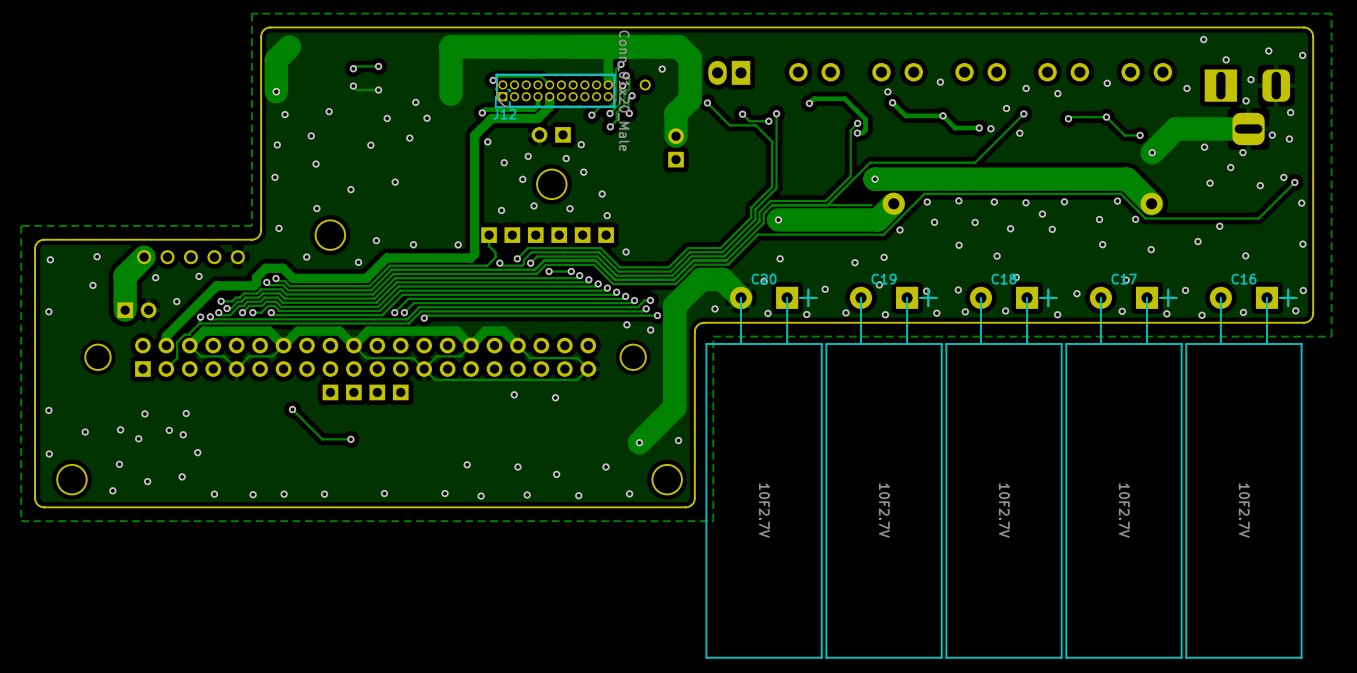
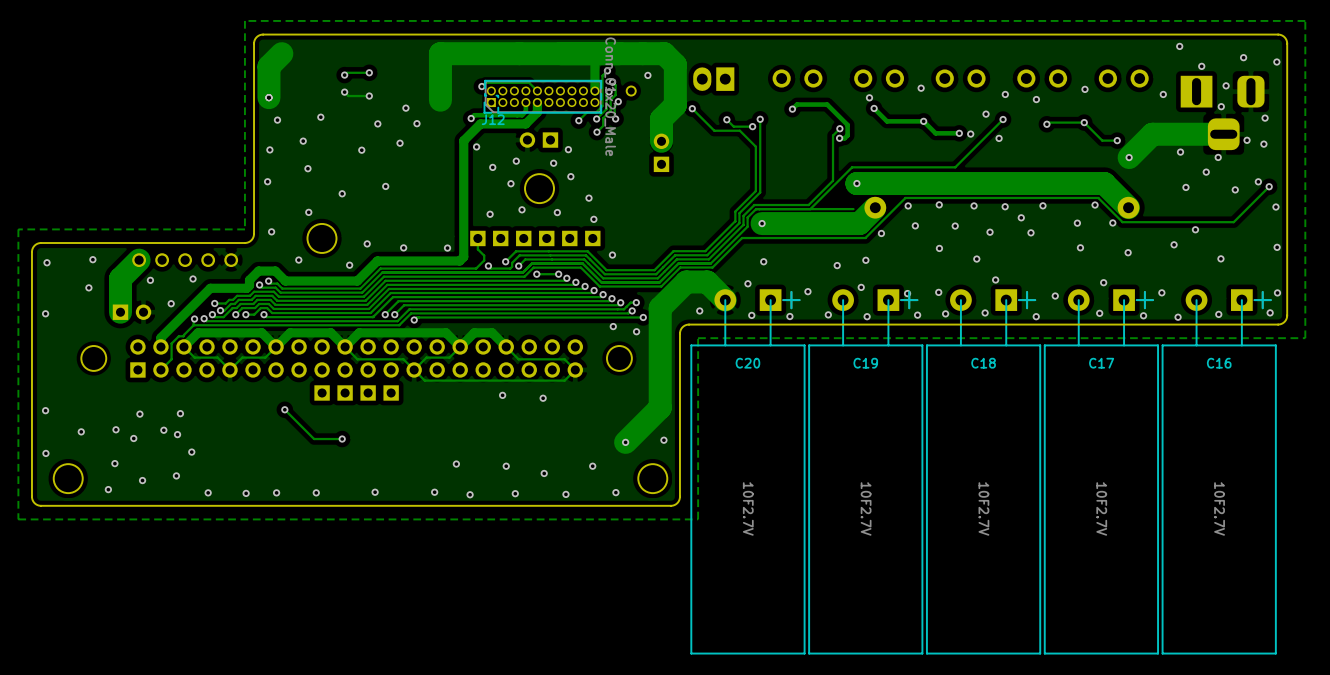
C20 name position: C20 (764, 279) -> C20 (747, 363)
C19 name position: C19 (884, 279) -> C19 (865, 363)
C18 name position: C18 (1004, 279) -> C18 (983, 363)
C17 name position: C17 (1124, 279) -> C17 (1101, 363)
C16 name position: C16 (1243, 279) -> C16 (1219, 363)

